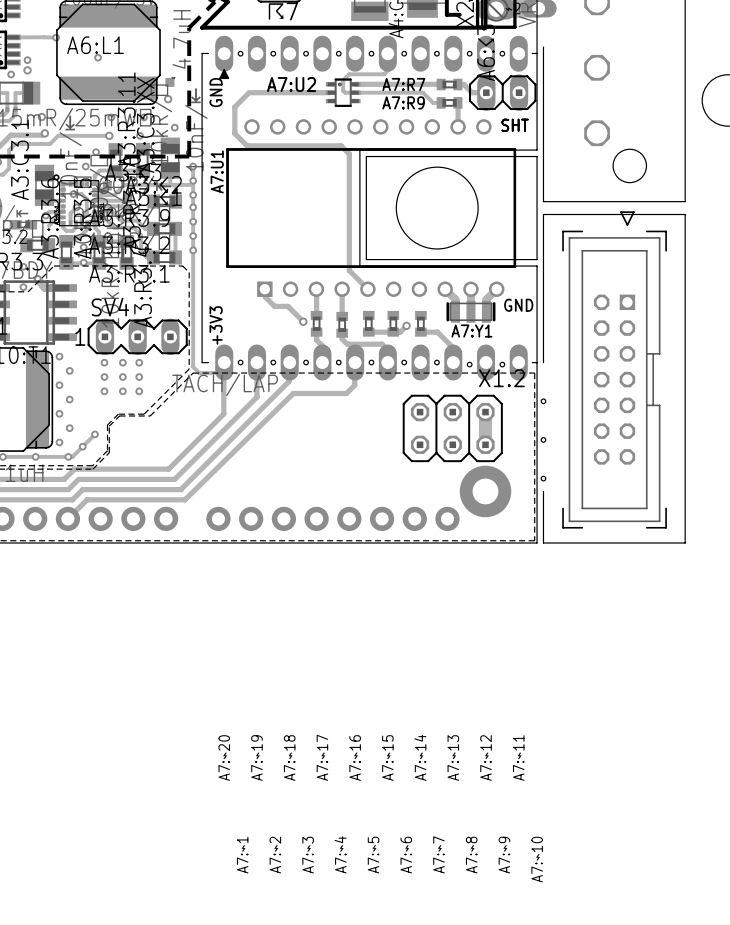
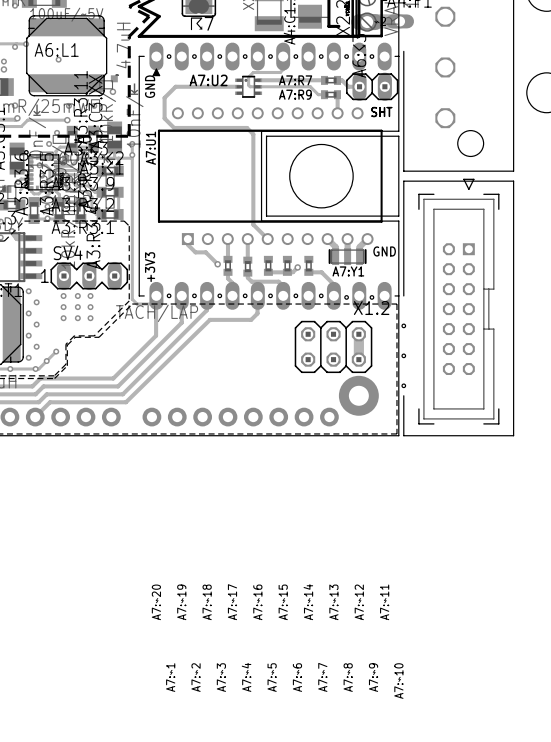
via: none -> (15, 46)
via: (174, 127) -> none
via: (139, 135) -> none
via: (193, 195) -> none
track: (76, 207) (70, 213) (70, 222) -> none
via: (193, 207) -> none
via: (193, 221) -> none
via: (193, 236) -> none
via: (193, 250) -> none

